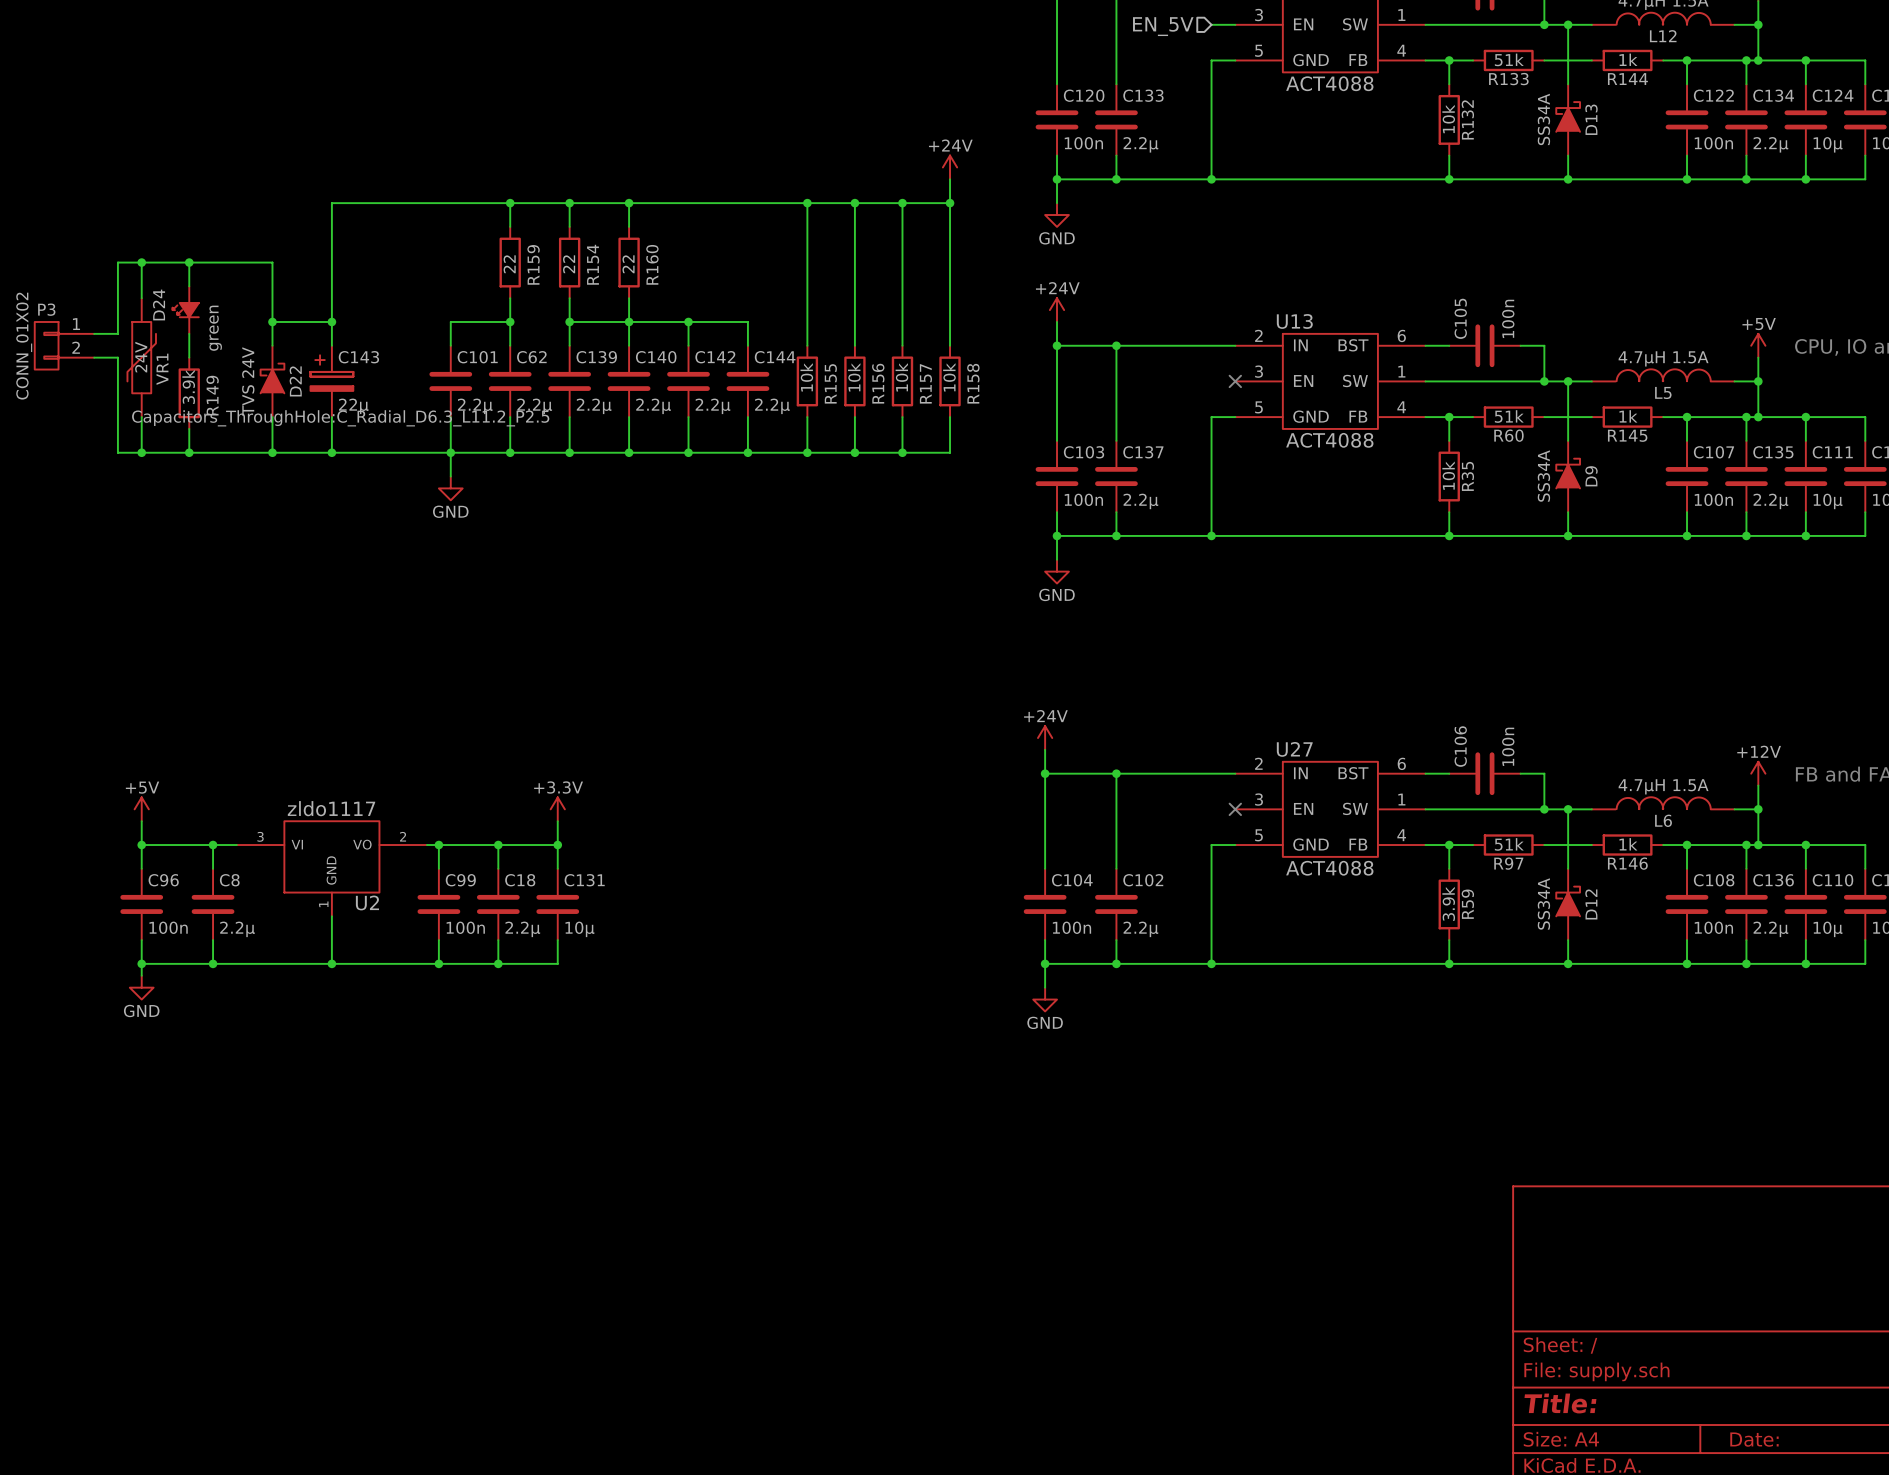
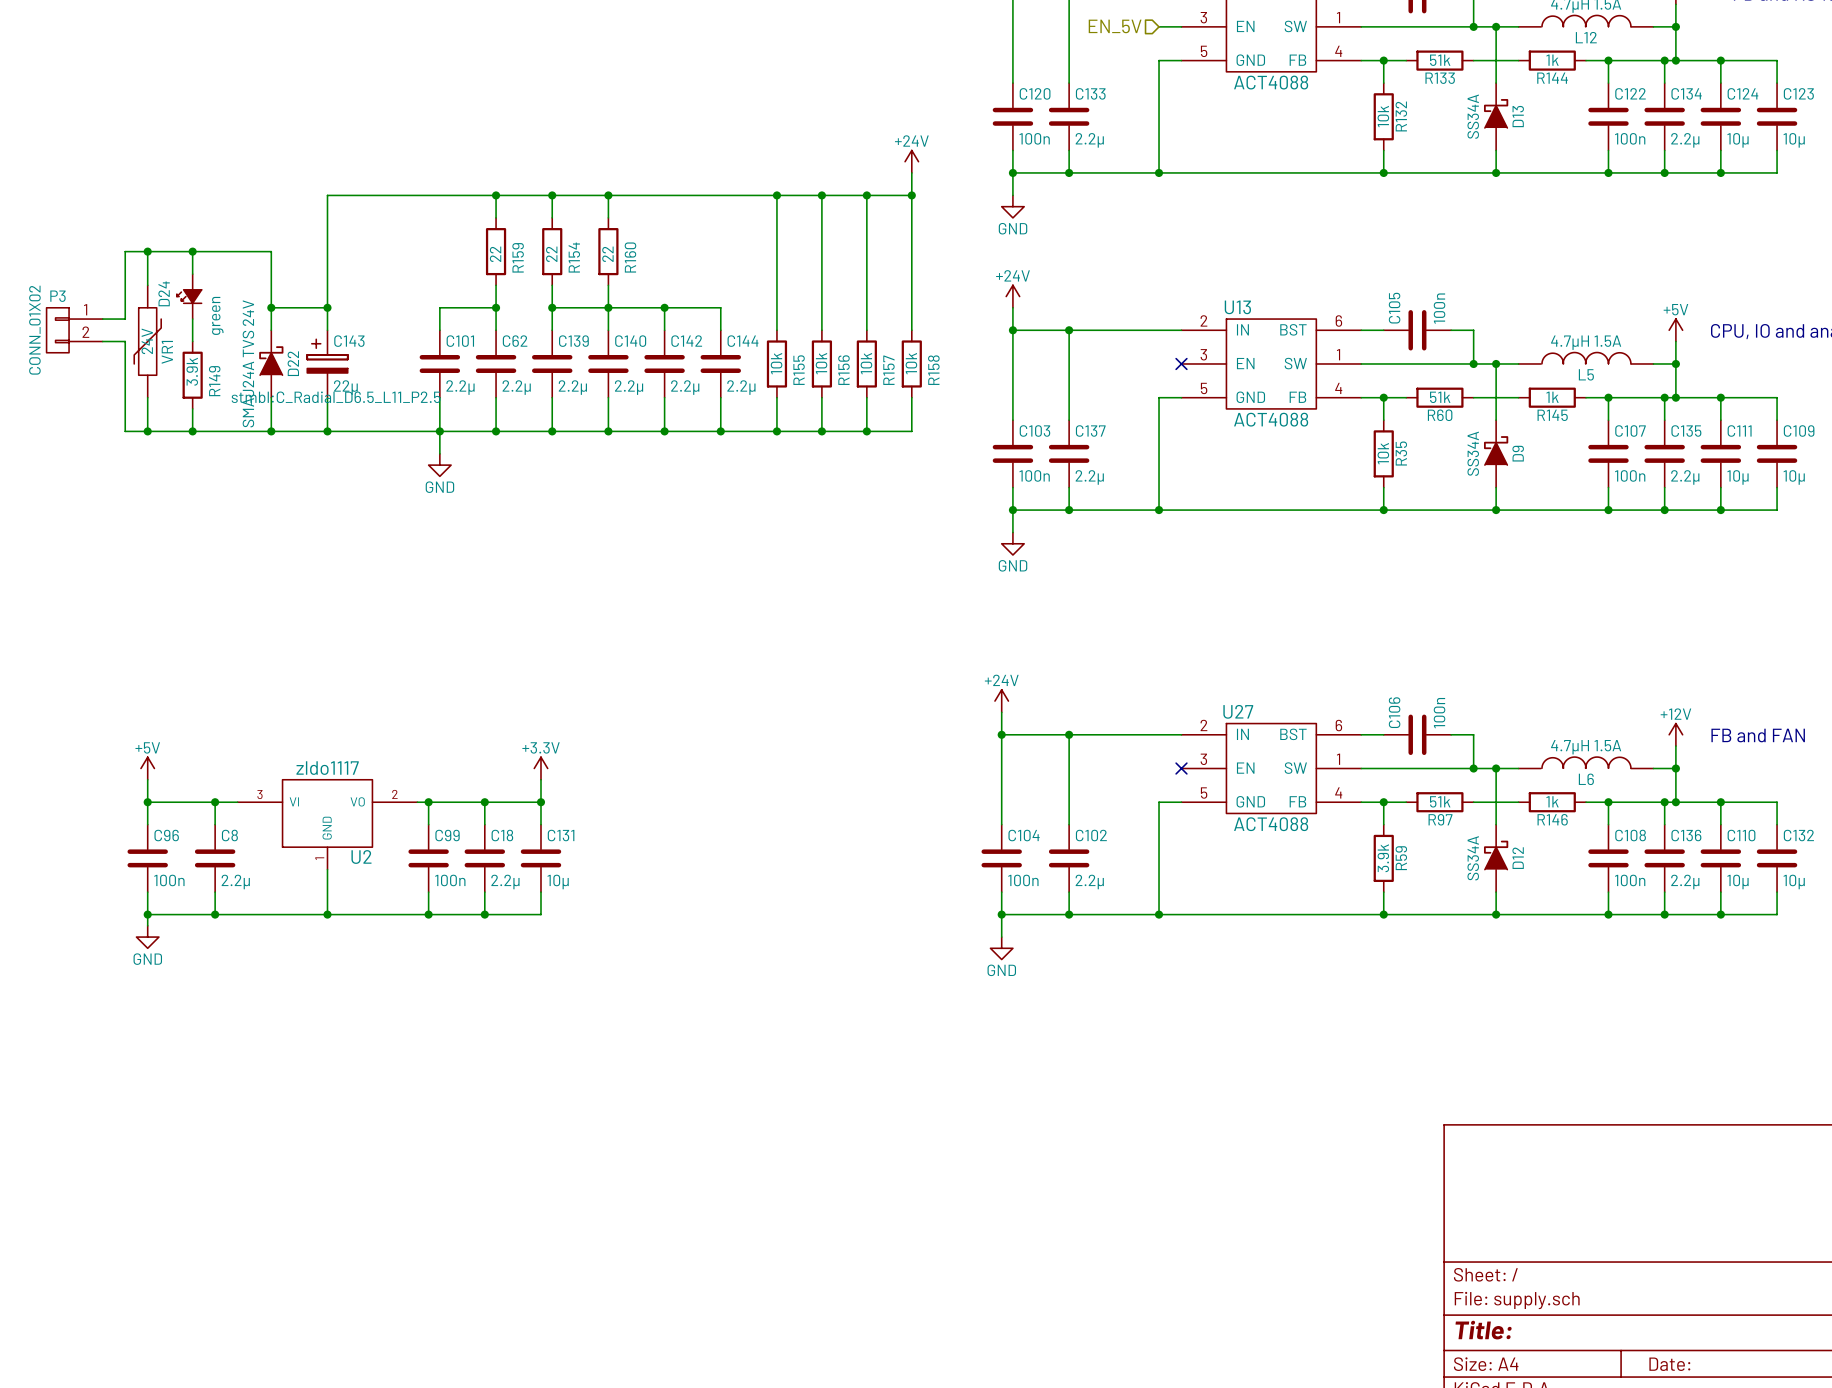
D22 value: TVS 24V (248, 381) -> SMAJ24A TVS 24V (248, 363)
C143 text: Capacitors_ThroughHole:C_Radial_D6.3_L11.2_P2.5 (340, 418) -> stmbl:C_Radial_D6.5_L11_P2.5 (336, 397)

